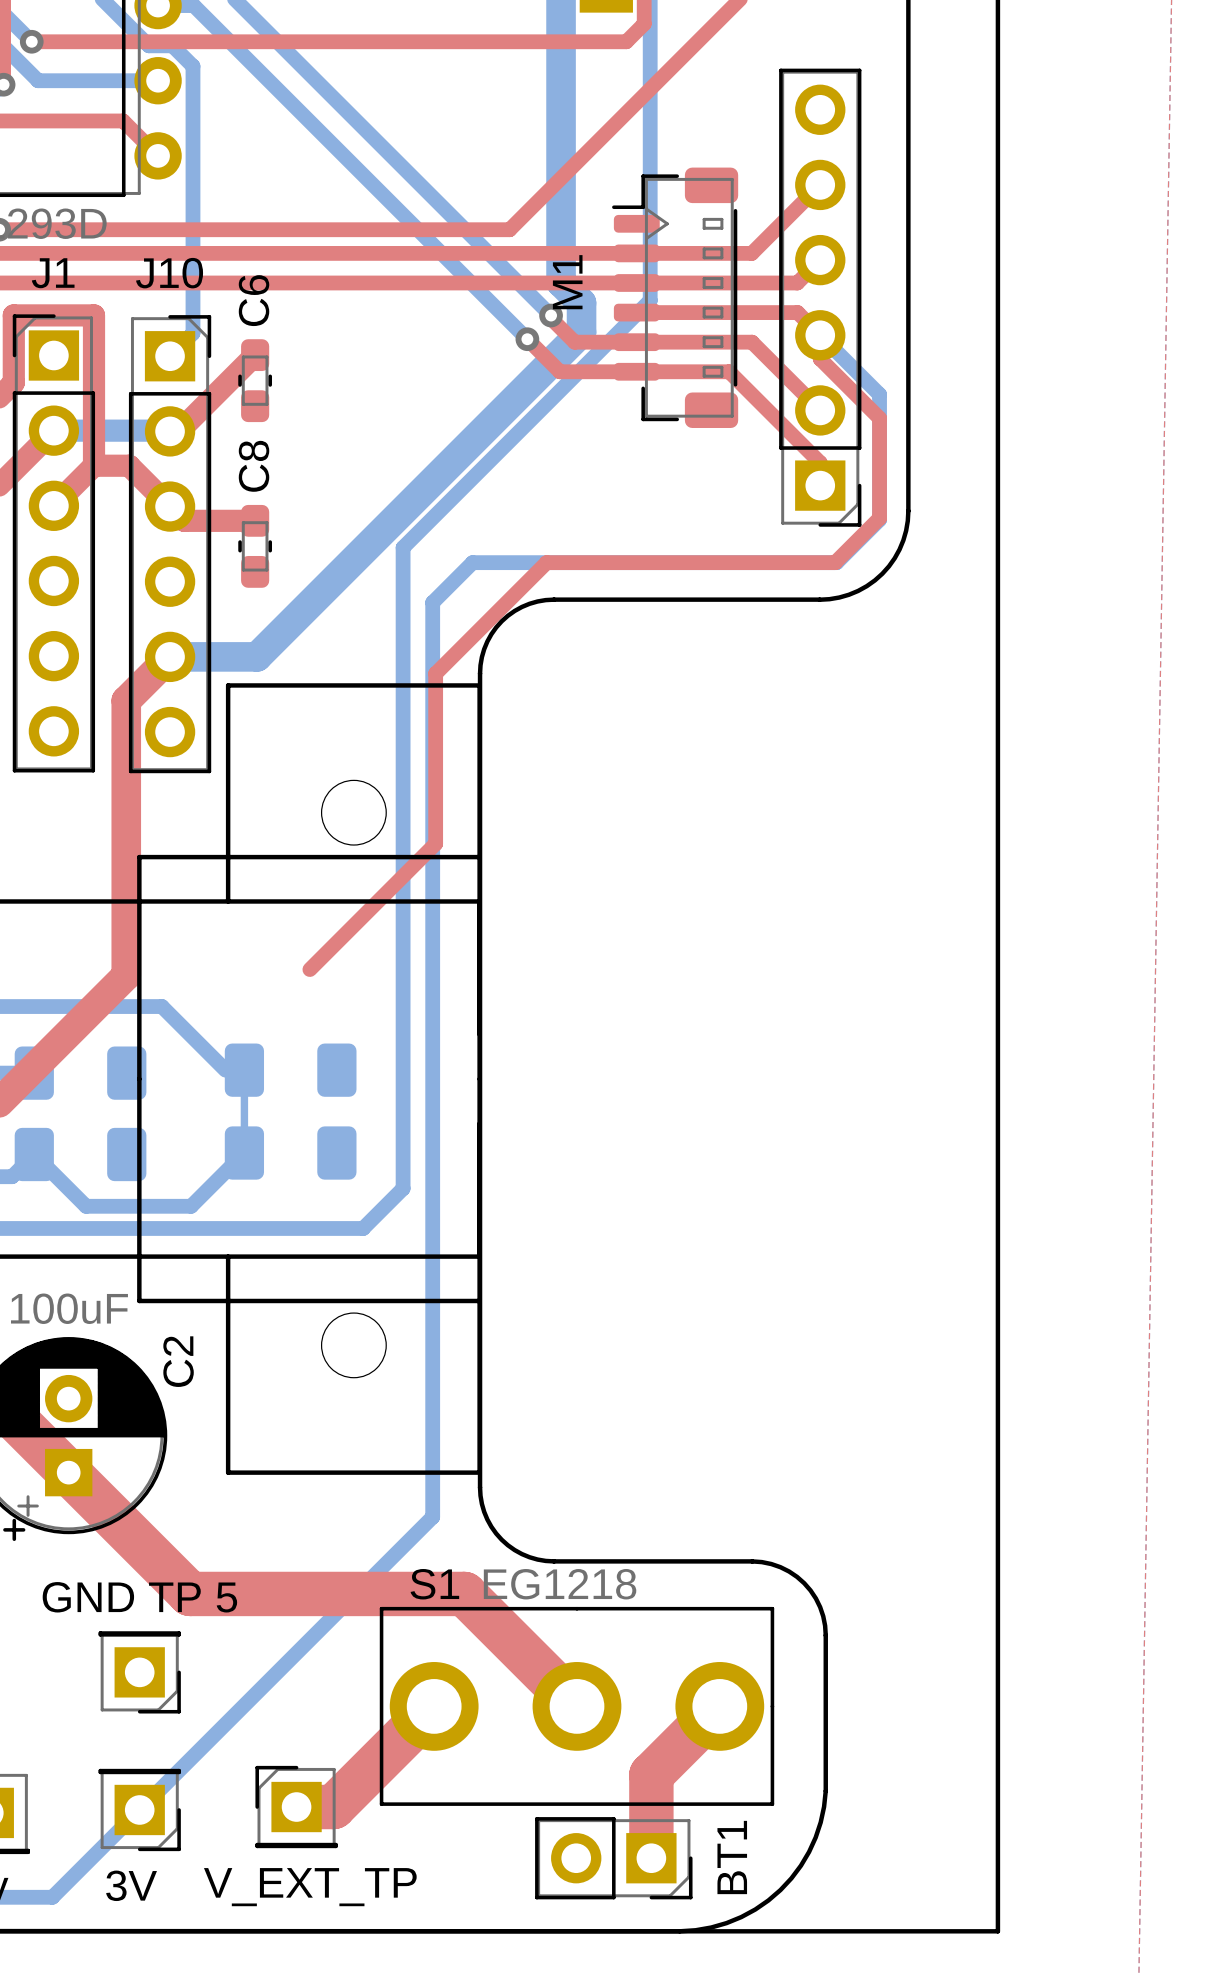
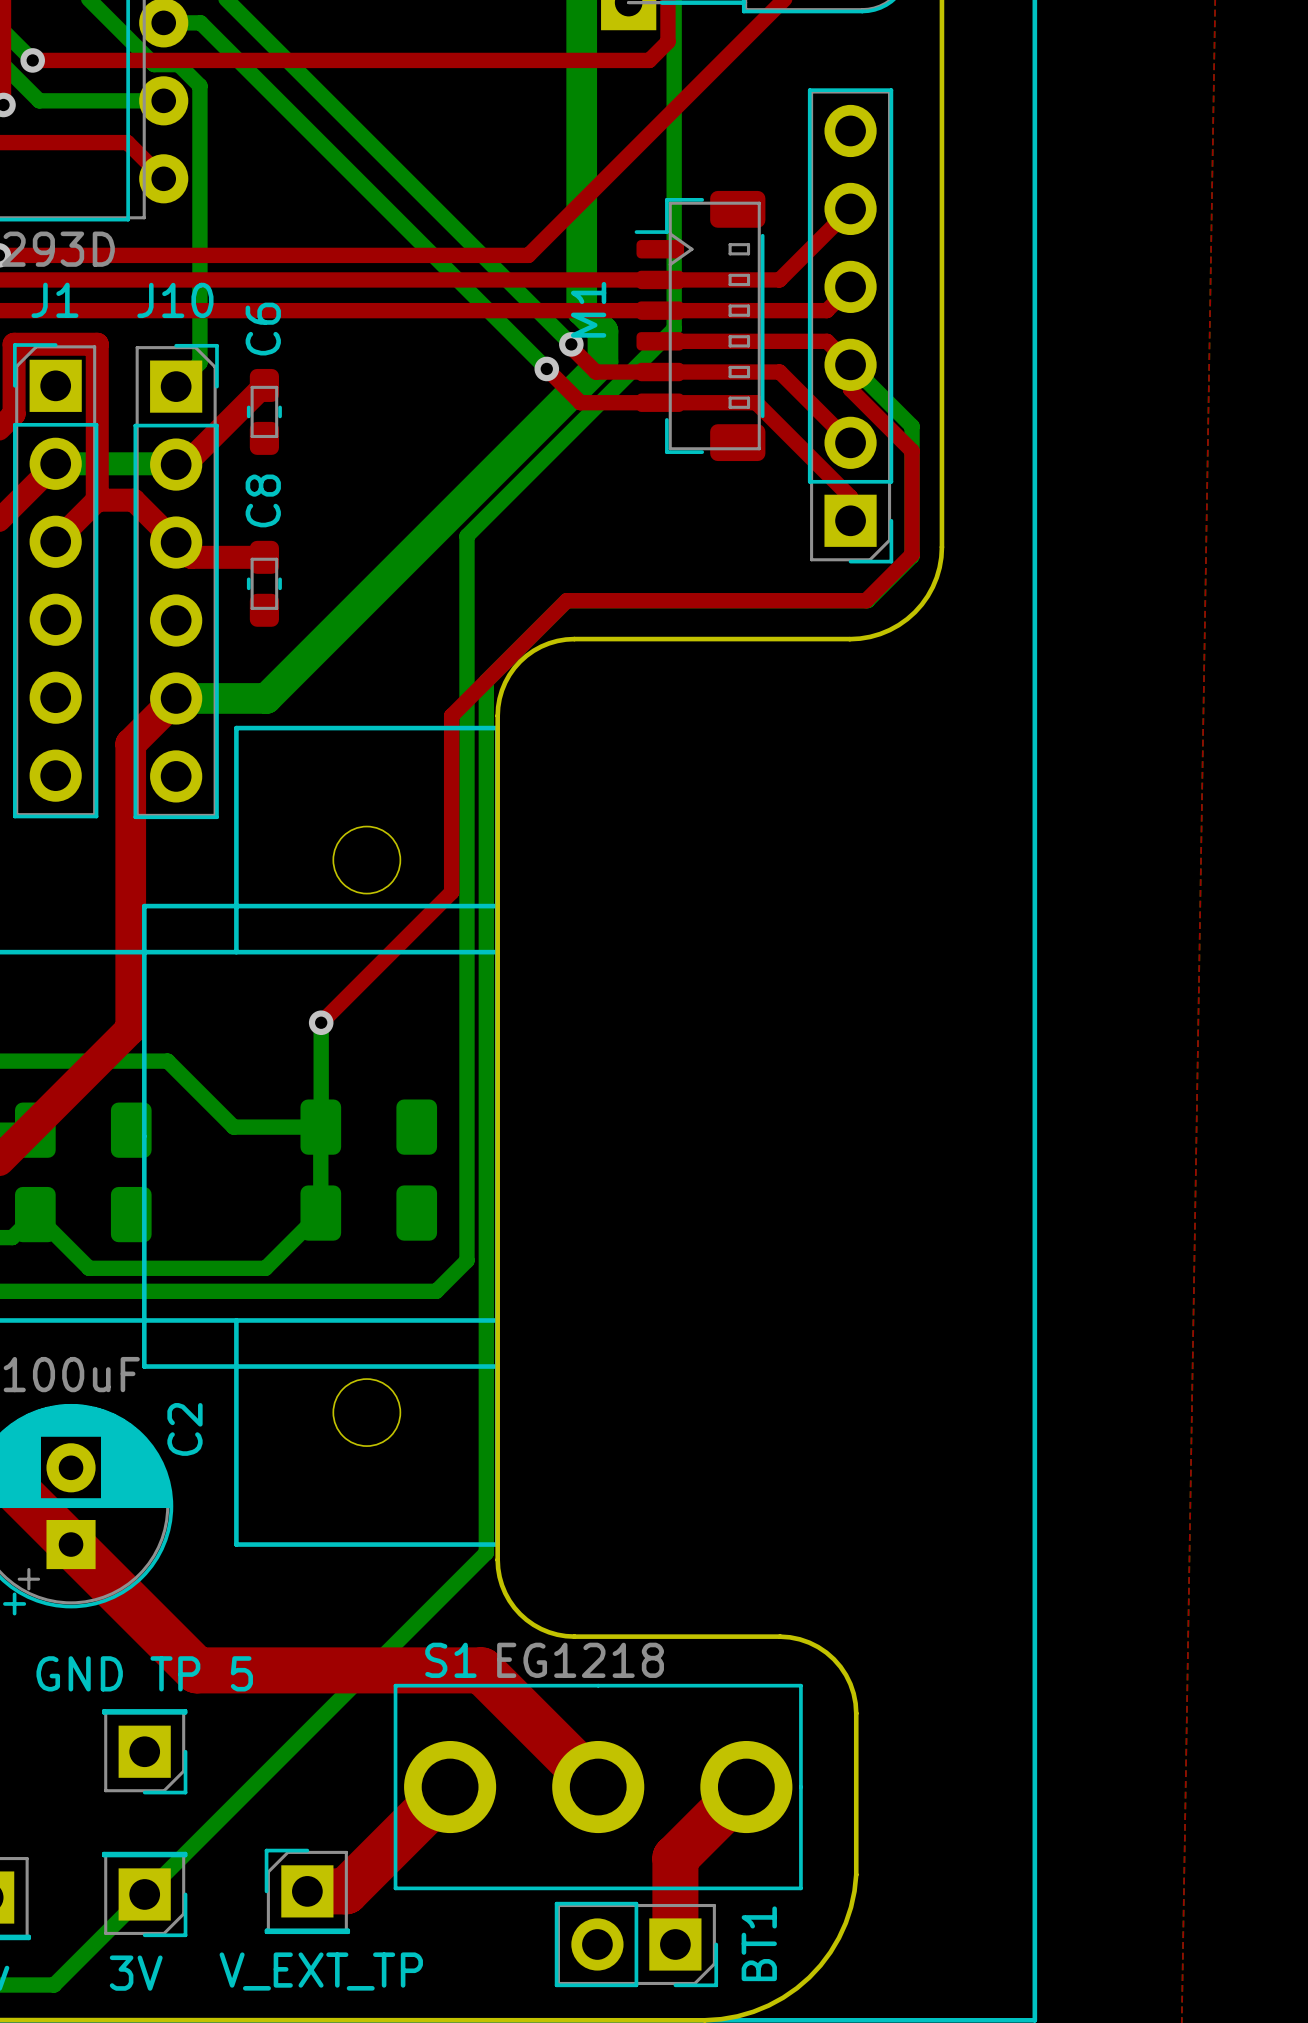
bottom track: (450, 500) (403, 547) (403, 1188) (363, 1228) -> (466, 536) (466, 1260) (436, 1291) (376, 1291)
bottom track: (546, 562) (472, 562) (432, 602) (432, 1517) -> (566, 600) (486, 681) (486, 1552) (448, 1590)
bottom track: none -> (321, 1022) (321, 1126)
via: none -> (321, 1022)
bottom track: (244, 1070) (244, 1153) (191, 1206) -> (233, 1127) (320, 1127) (320, 1213) (265, 1268) (198, 1268)
part: (290, 1070) -> none
part: none -> (368, 1127)
part: (290, 1153) -> none
part: none -> (368, 1213)

